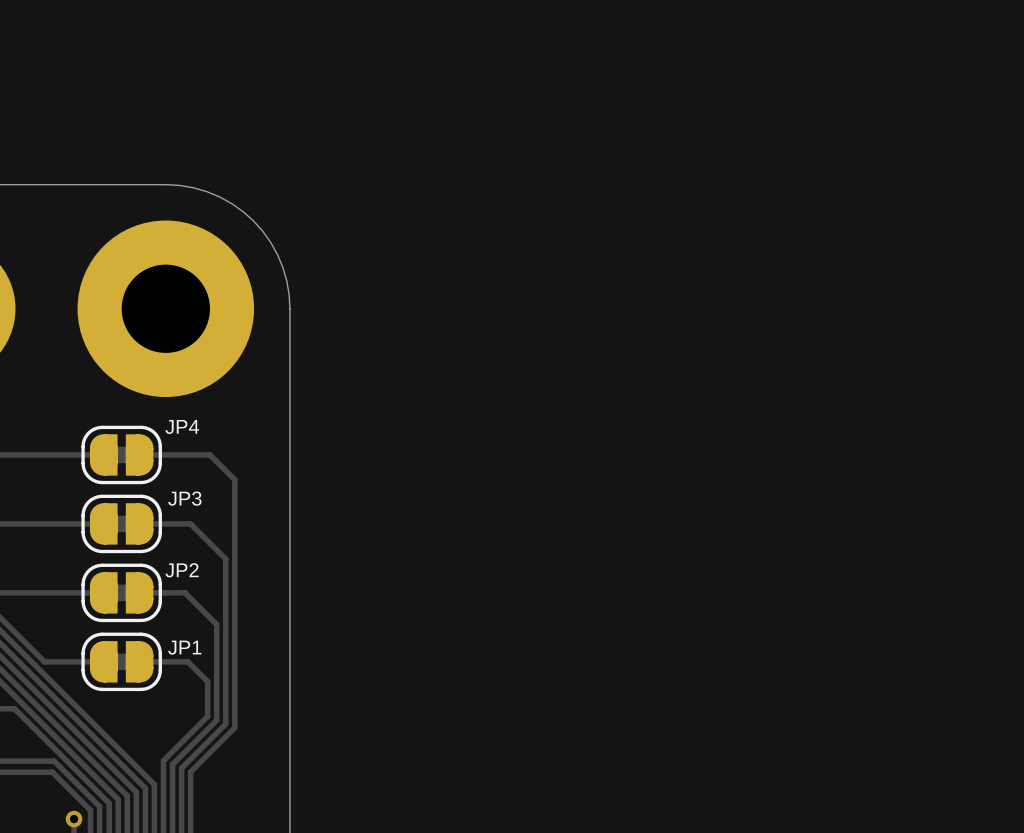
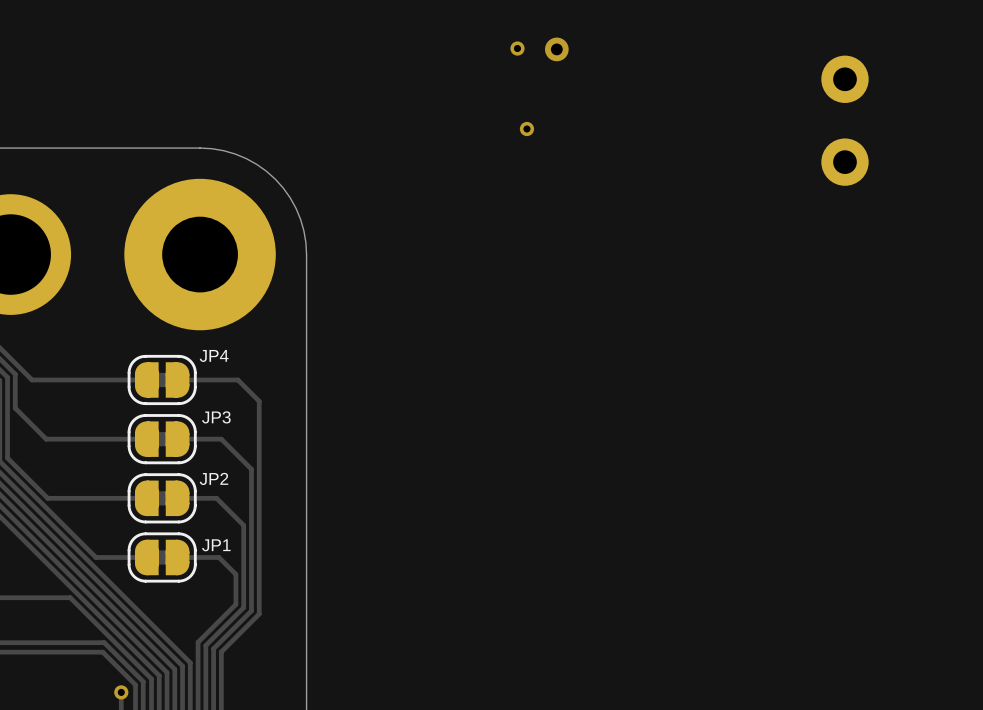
via: none -> (517, 48)
via: none -> (556, 49)
part: none -> (845, 79)
via: none -> (526, 128)
part: none -> (845, 162)

